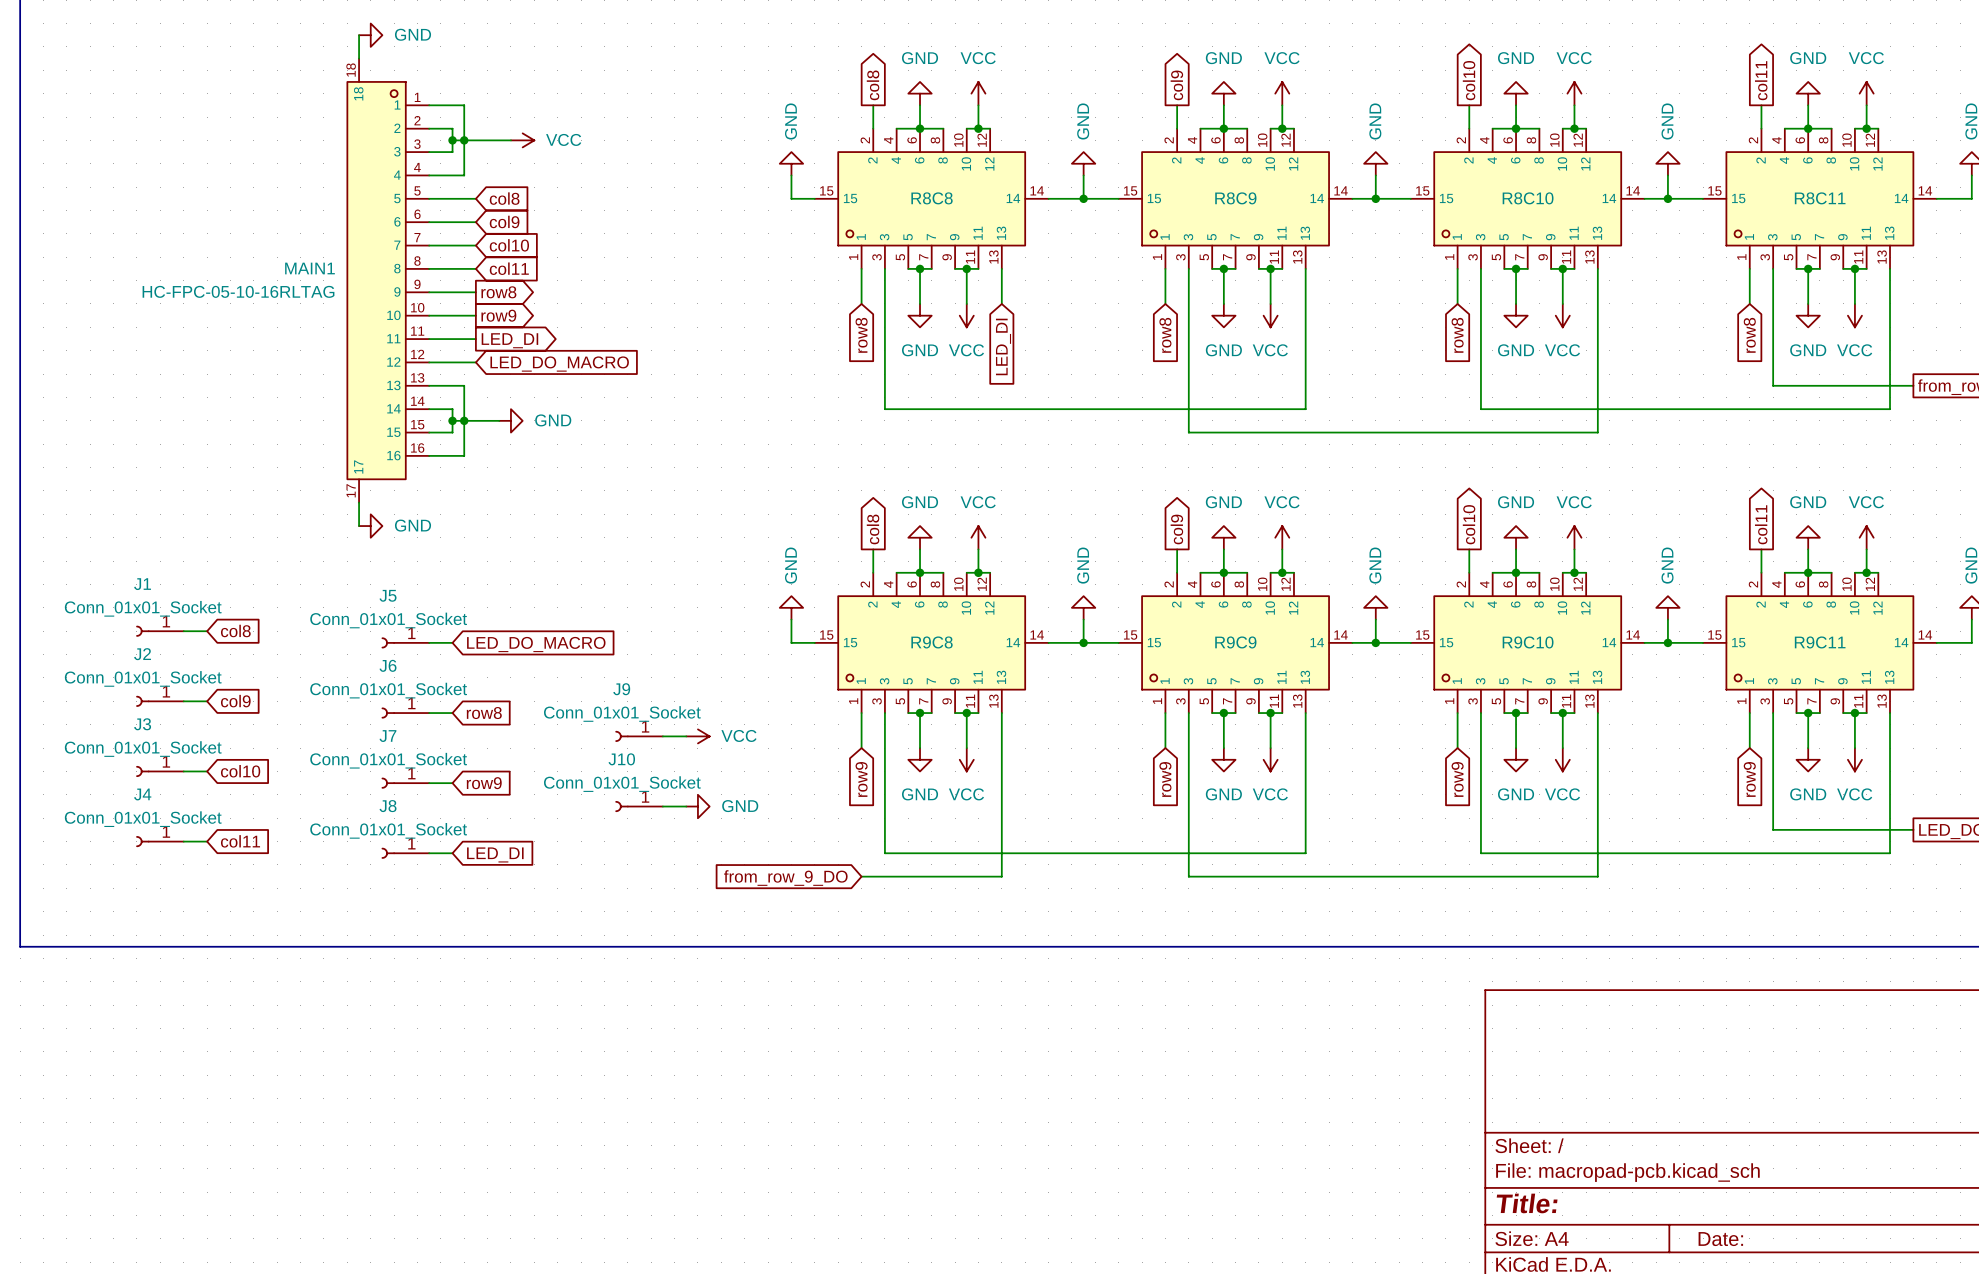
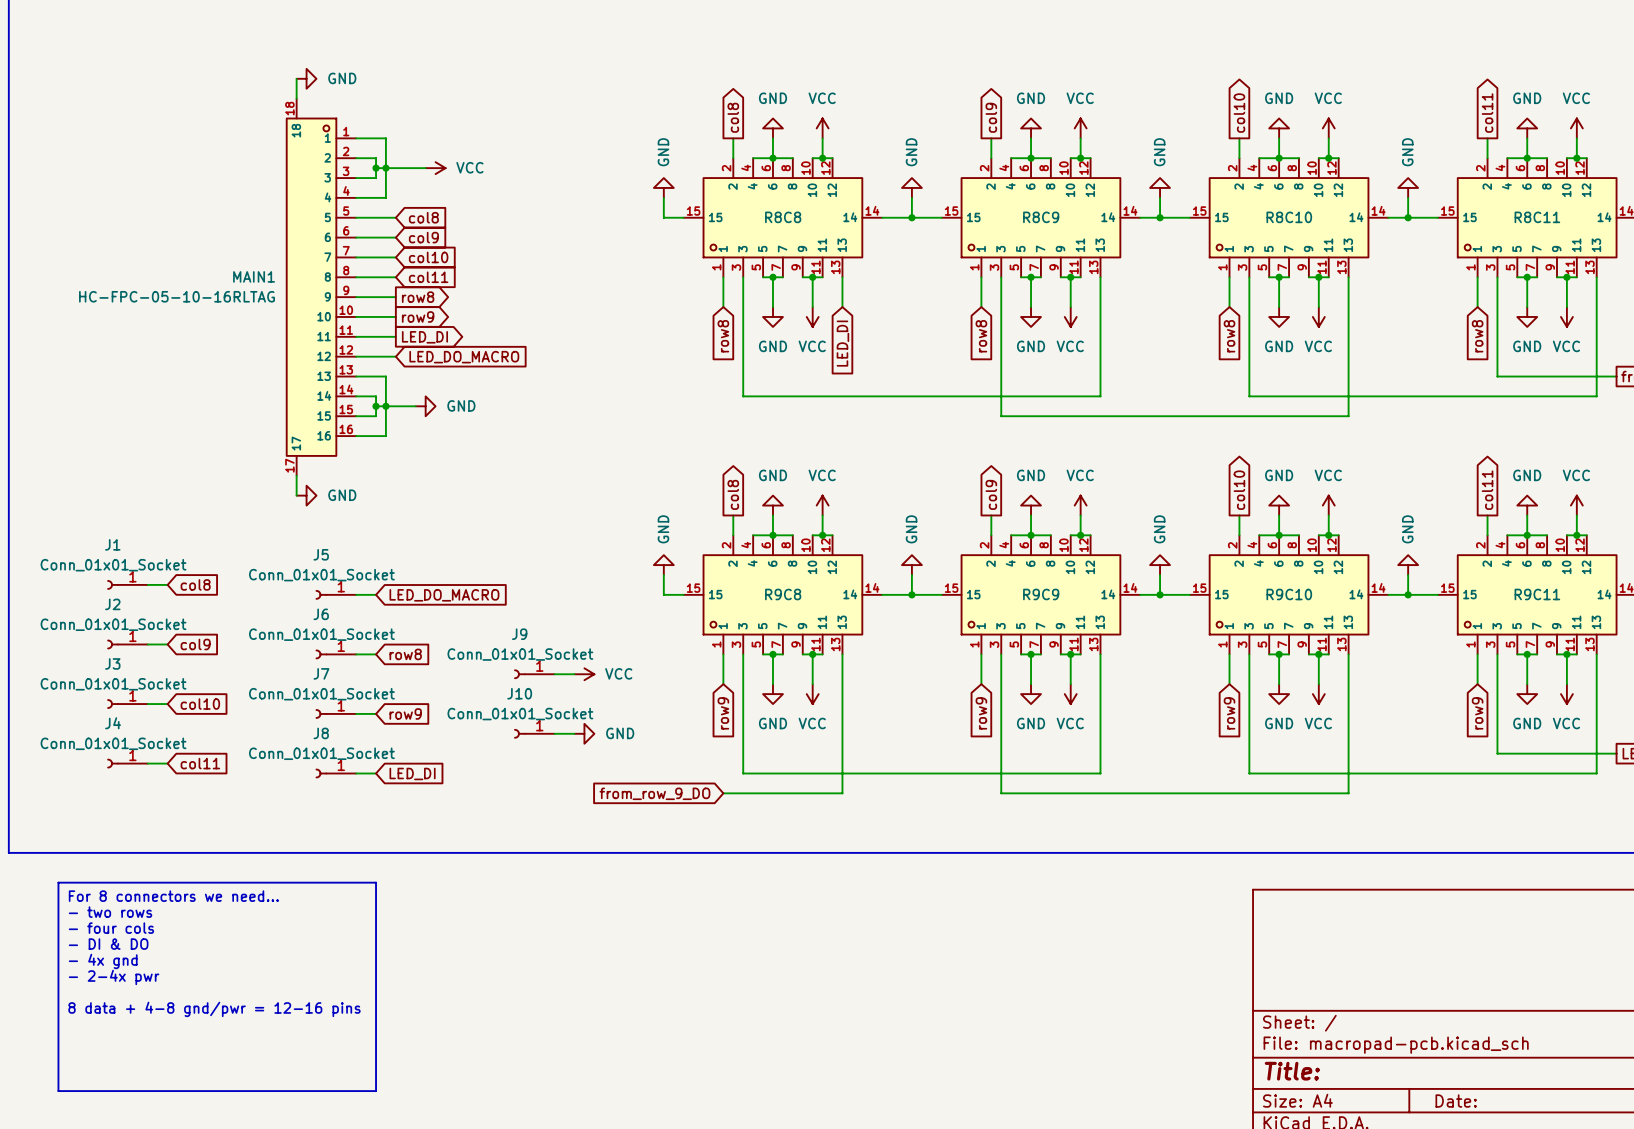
line: none -> (58, 882) (376, 882) (376, 1091) (58, 1091) (58, 882)
text: none -> For 8 connectors we need... (173, 896)
text: none -> - two rows (110, 912)
text: none -> - four cols (111, 928)
text: none -> - DI & DO (108, 944)
text: none -> - 4x gnd (103, 961)
text: none -> - 2-4x pwr (114, 977)
text: none -> 8 data + 4-8 gnd/pwr = 12-16 pins (214, 1009)

